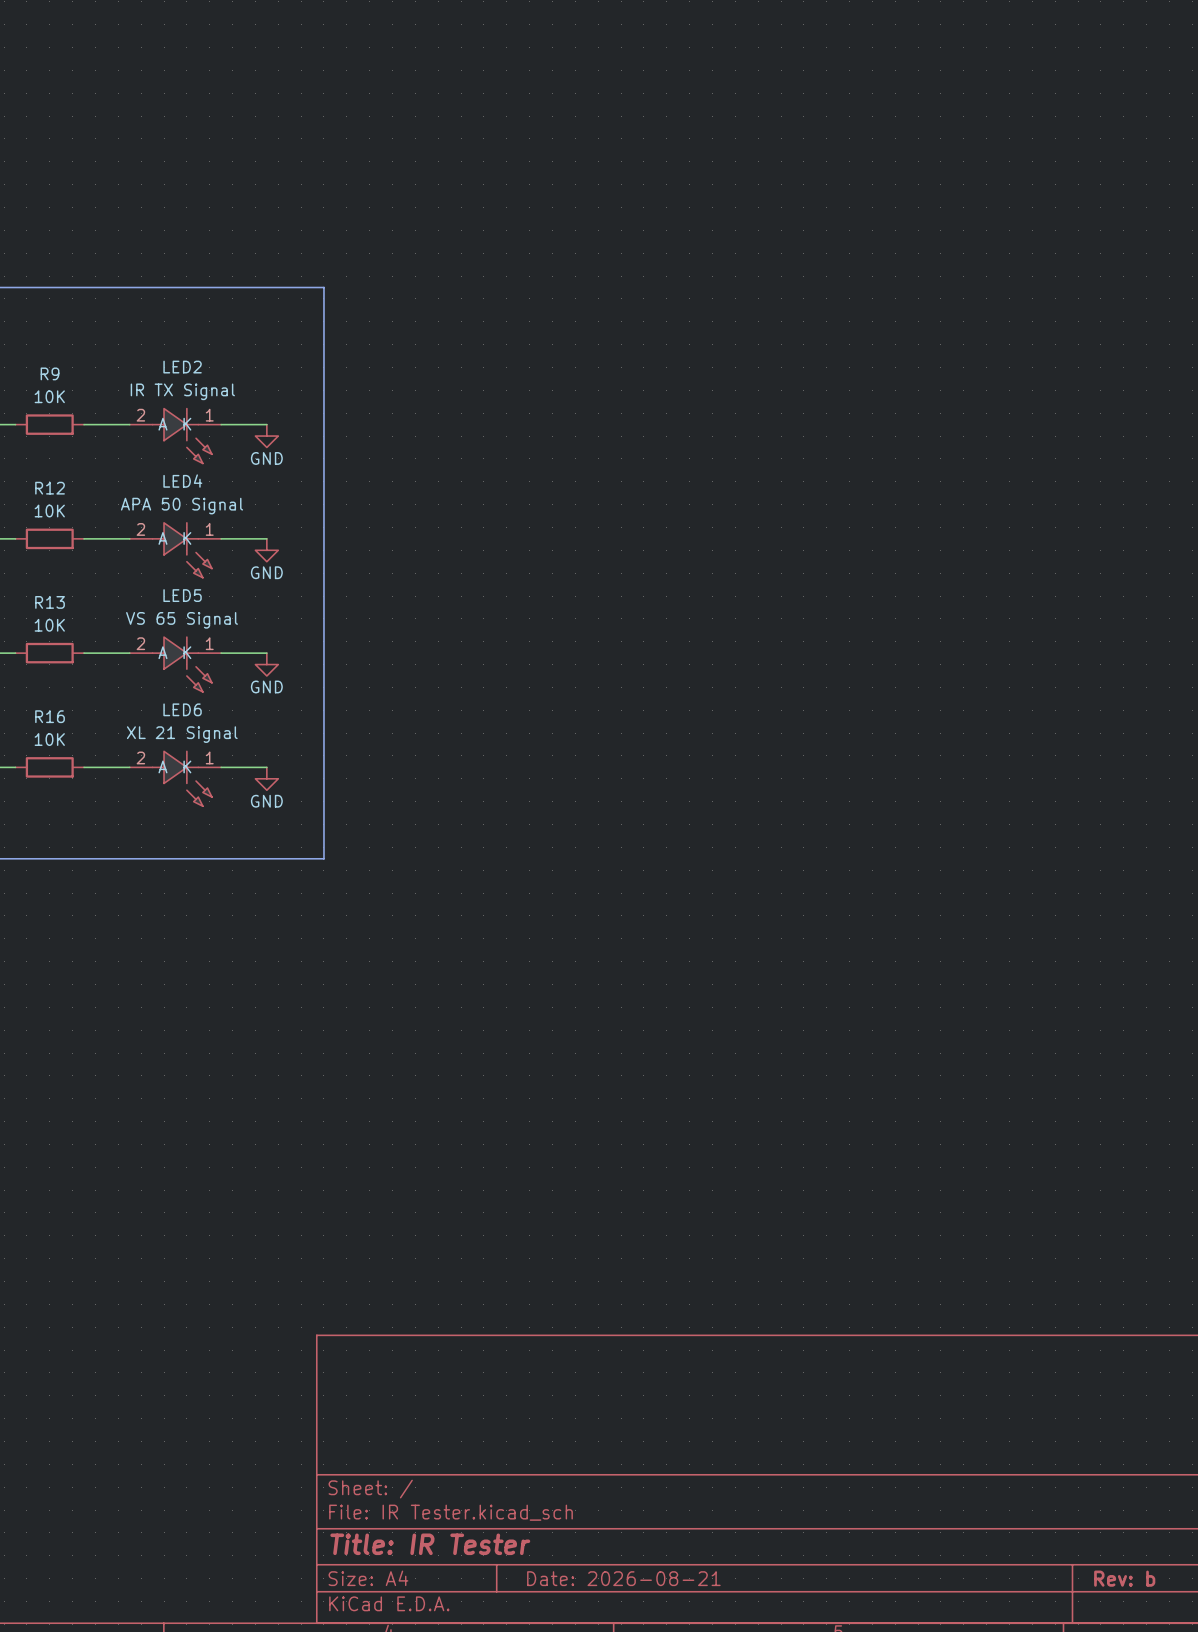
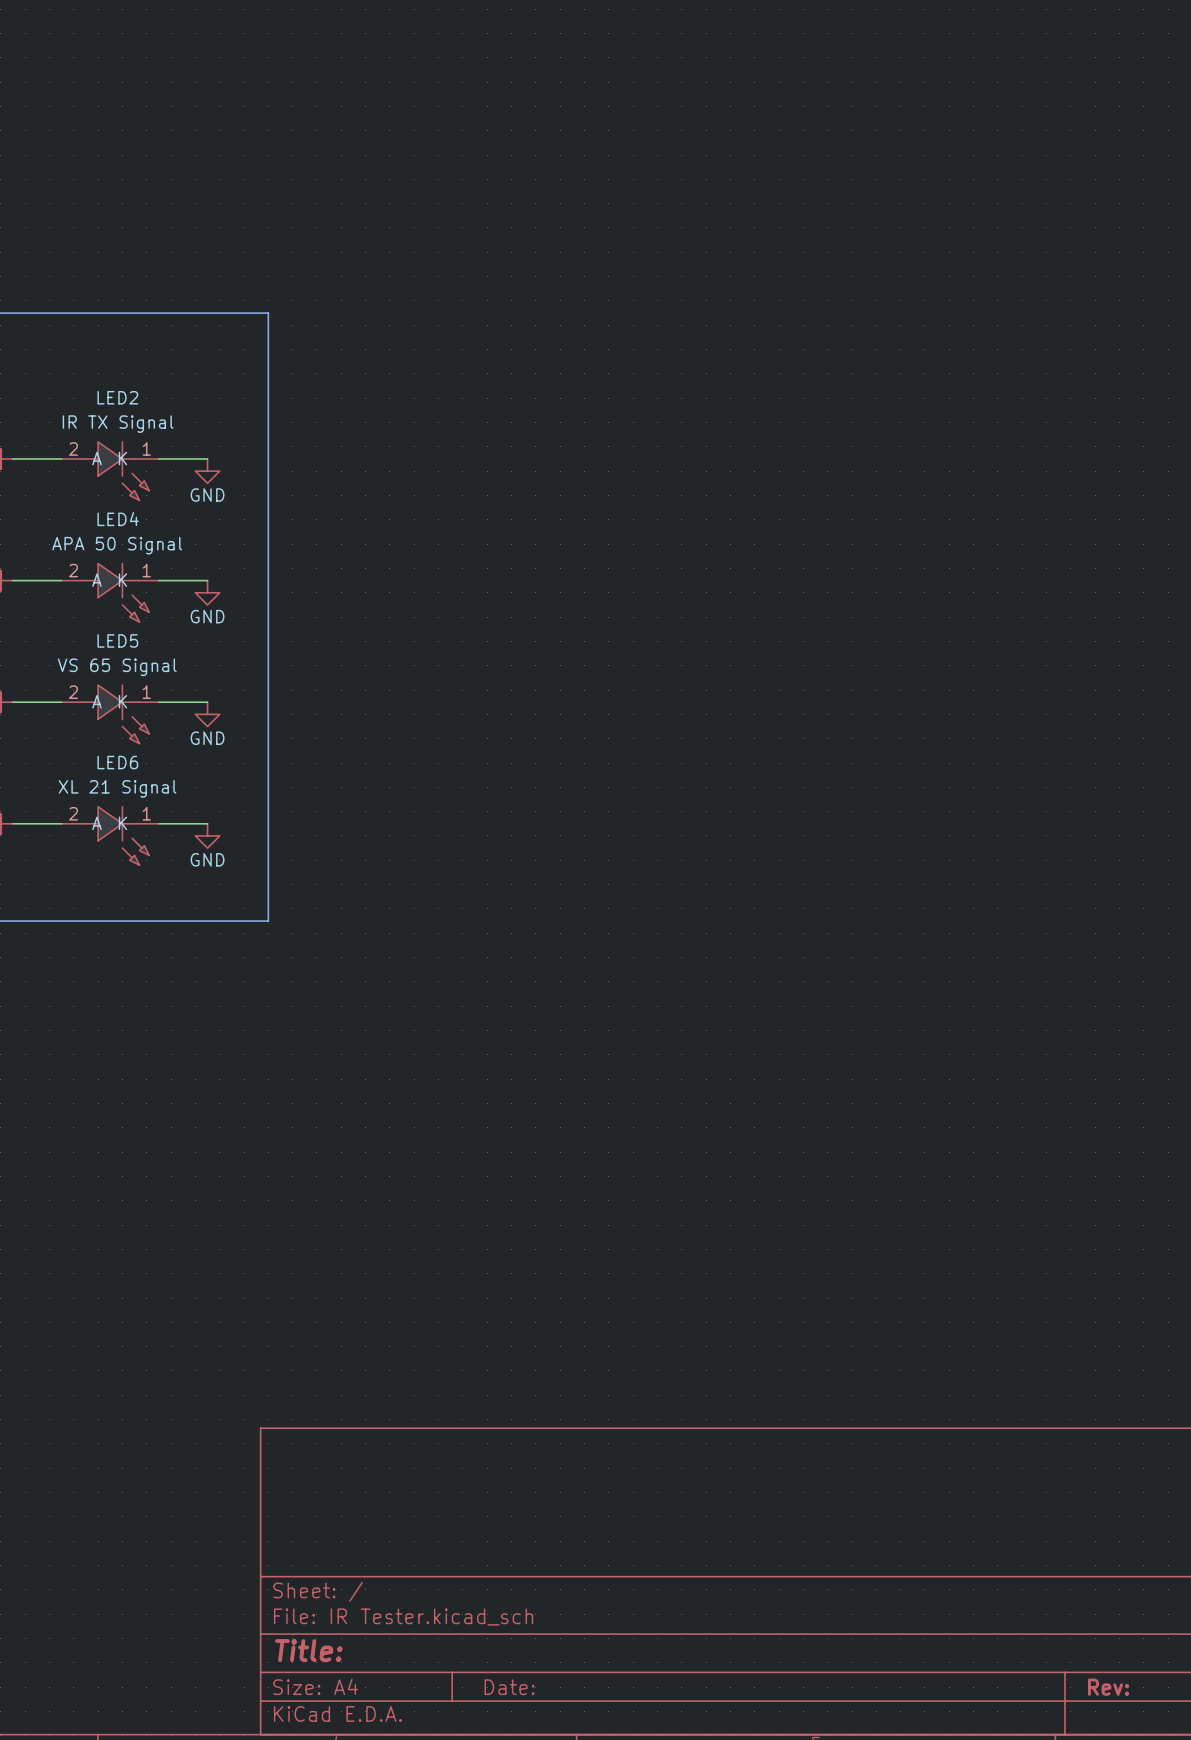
title block: Title: IR Tester (430, 1544) -> Title: (308, 1650)
title block: Date: 2026-08-21 (623, 1578) -> Date: (509, 1687)
title block: Rev: b (1124, 1578) -> Rev: (1108, 1687)

